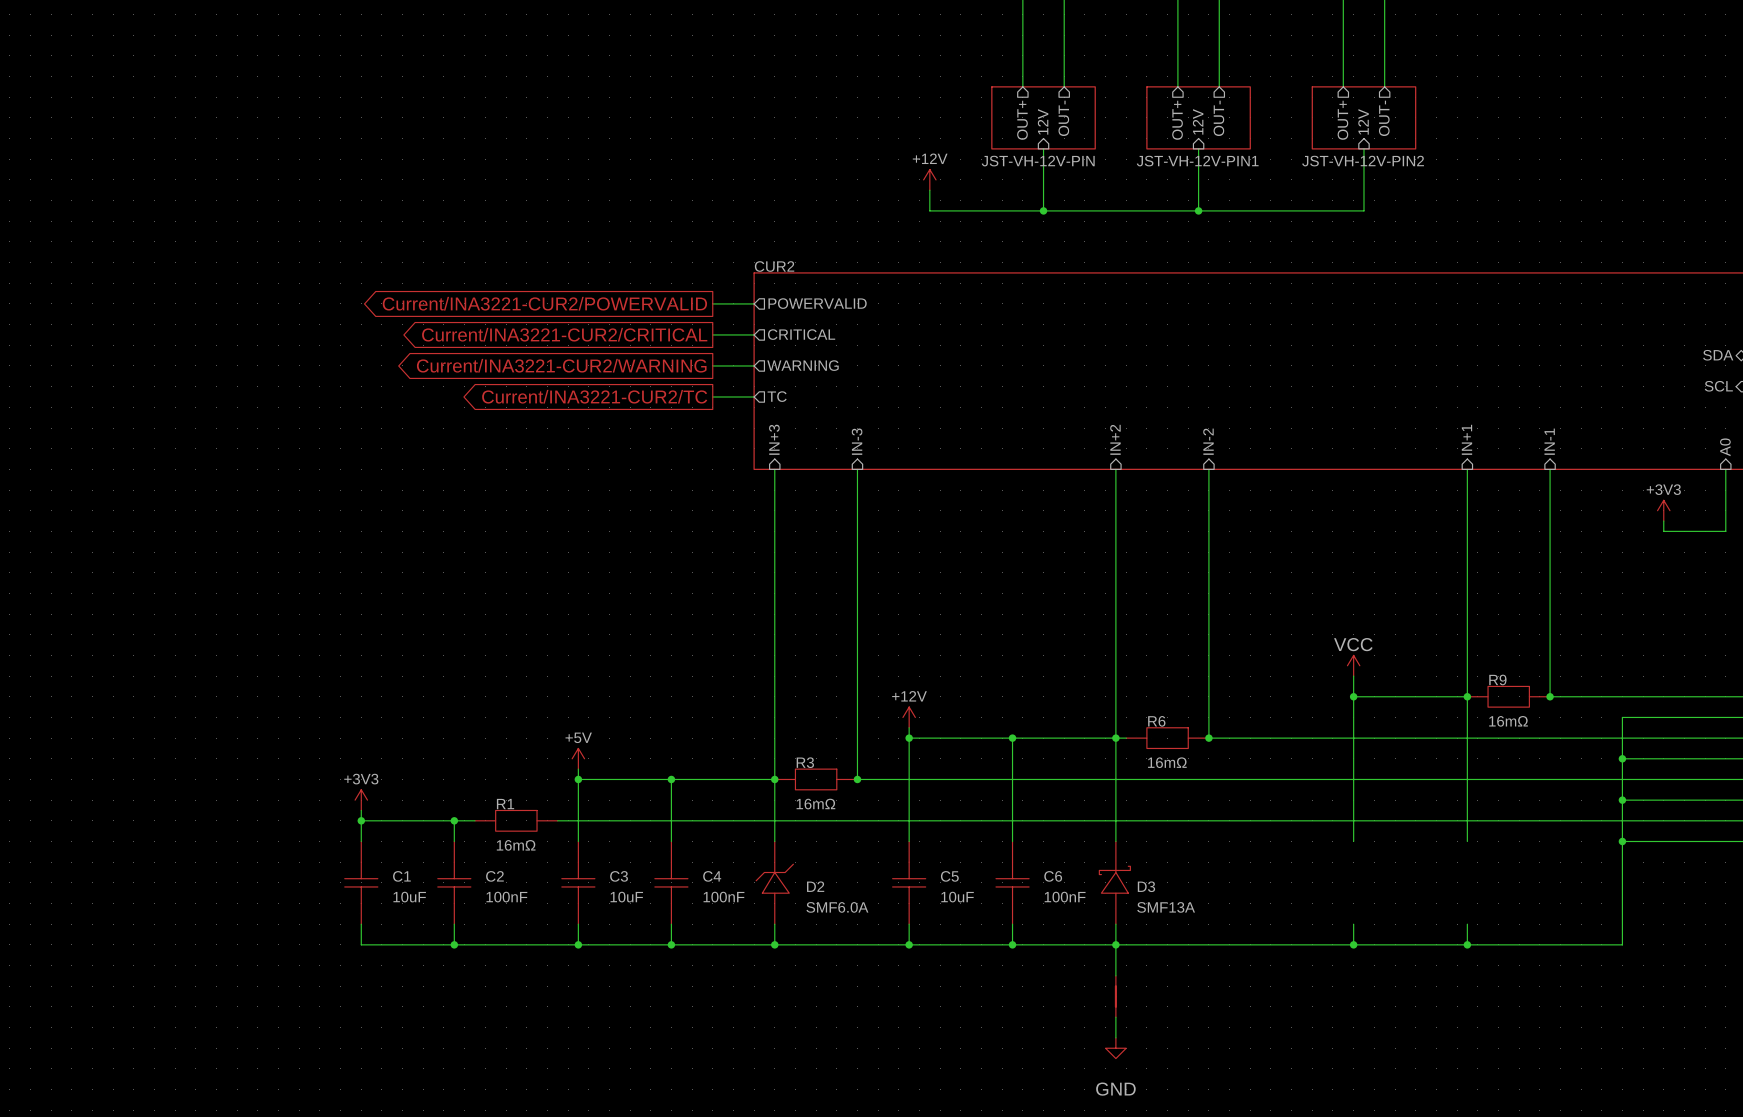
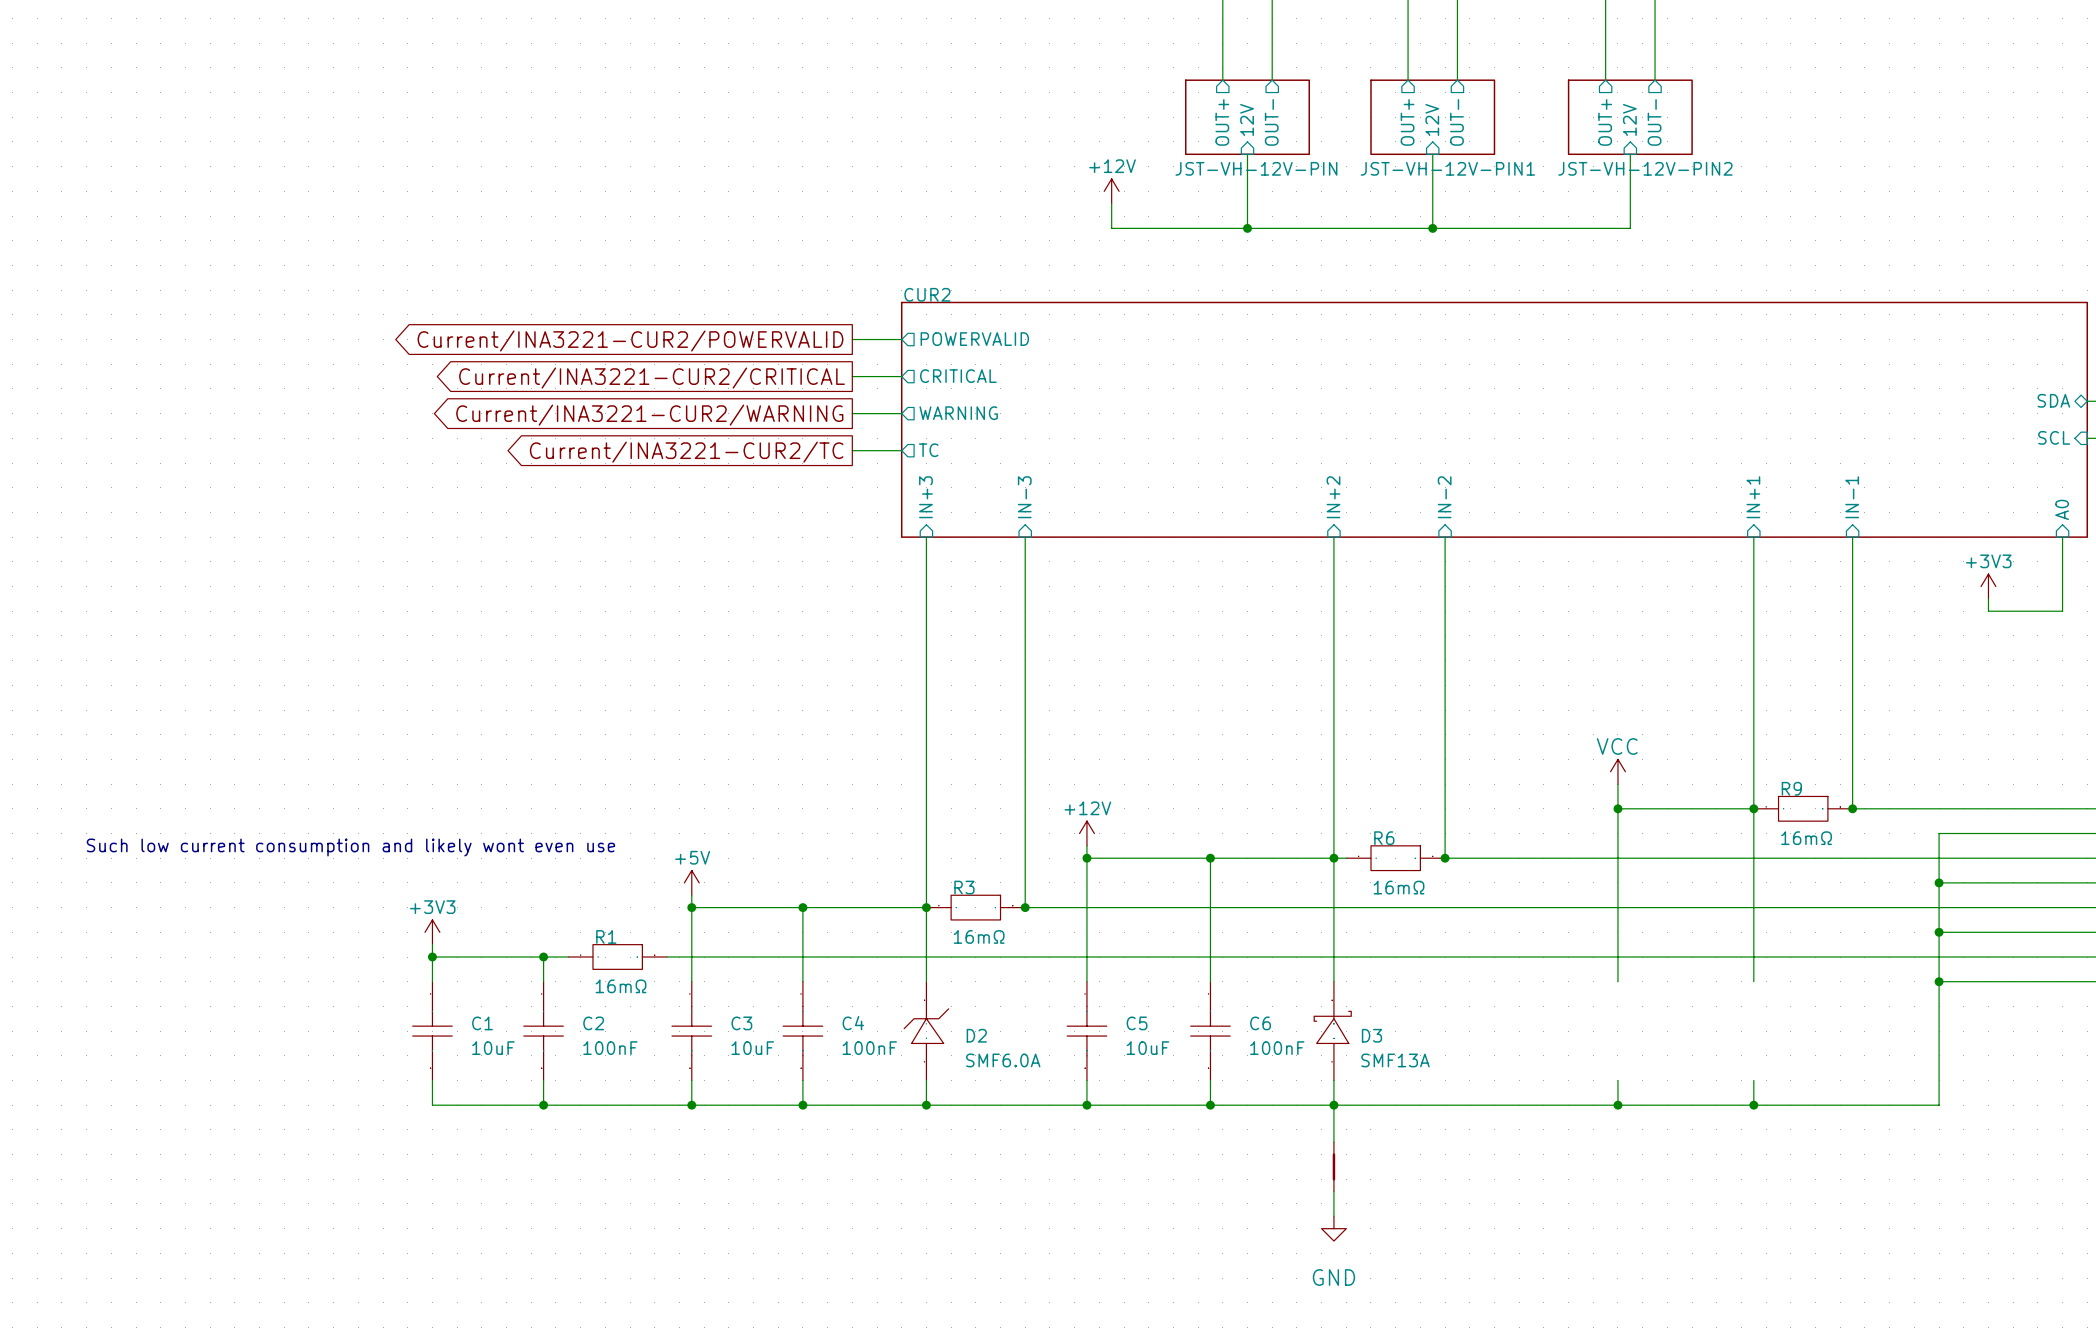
text: none -> Such low current consumption and likely wont even use (350, 847)

